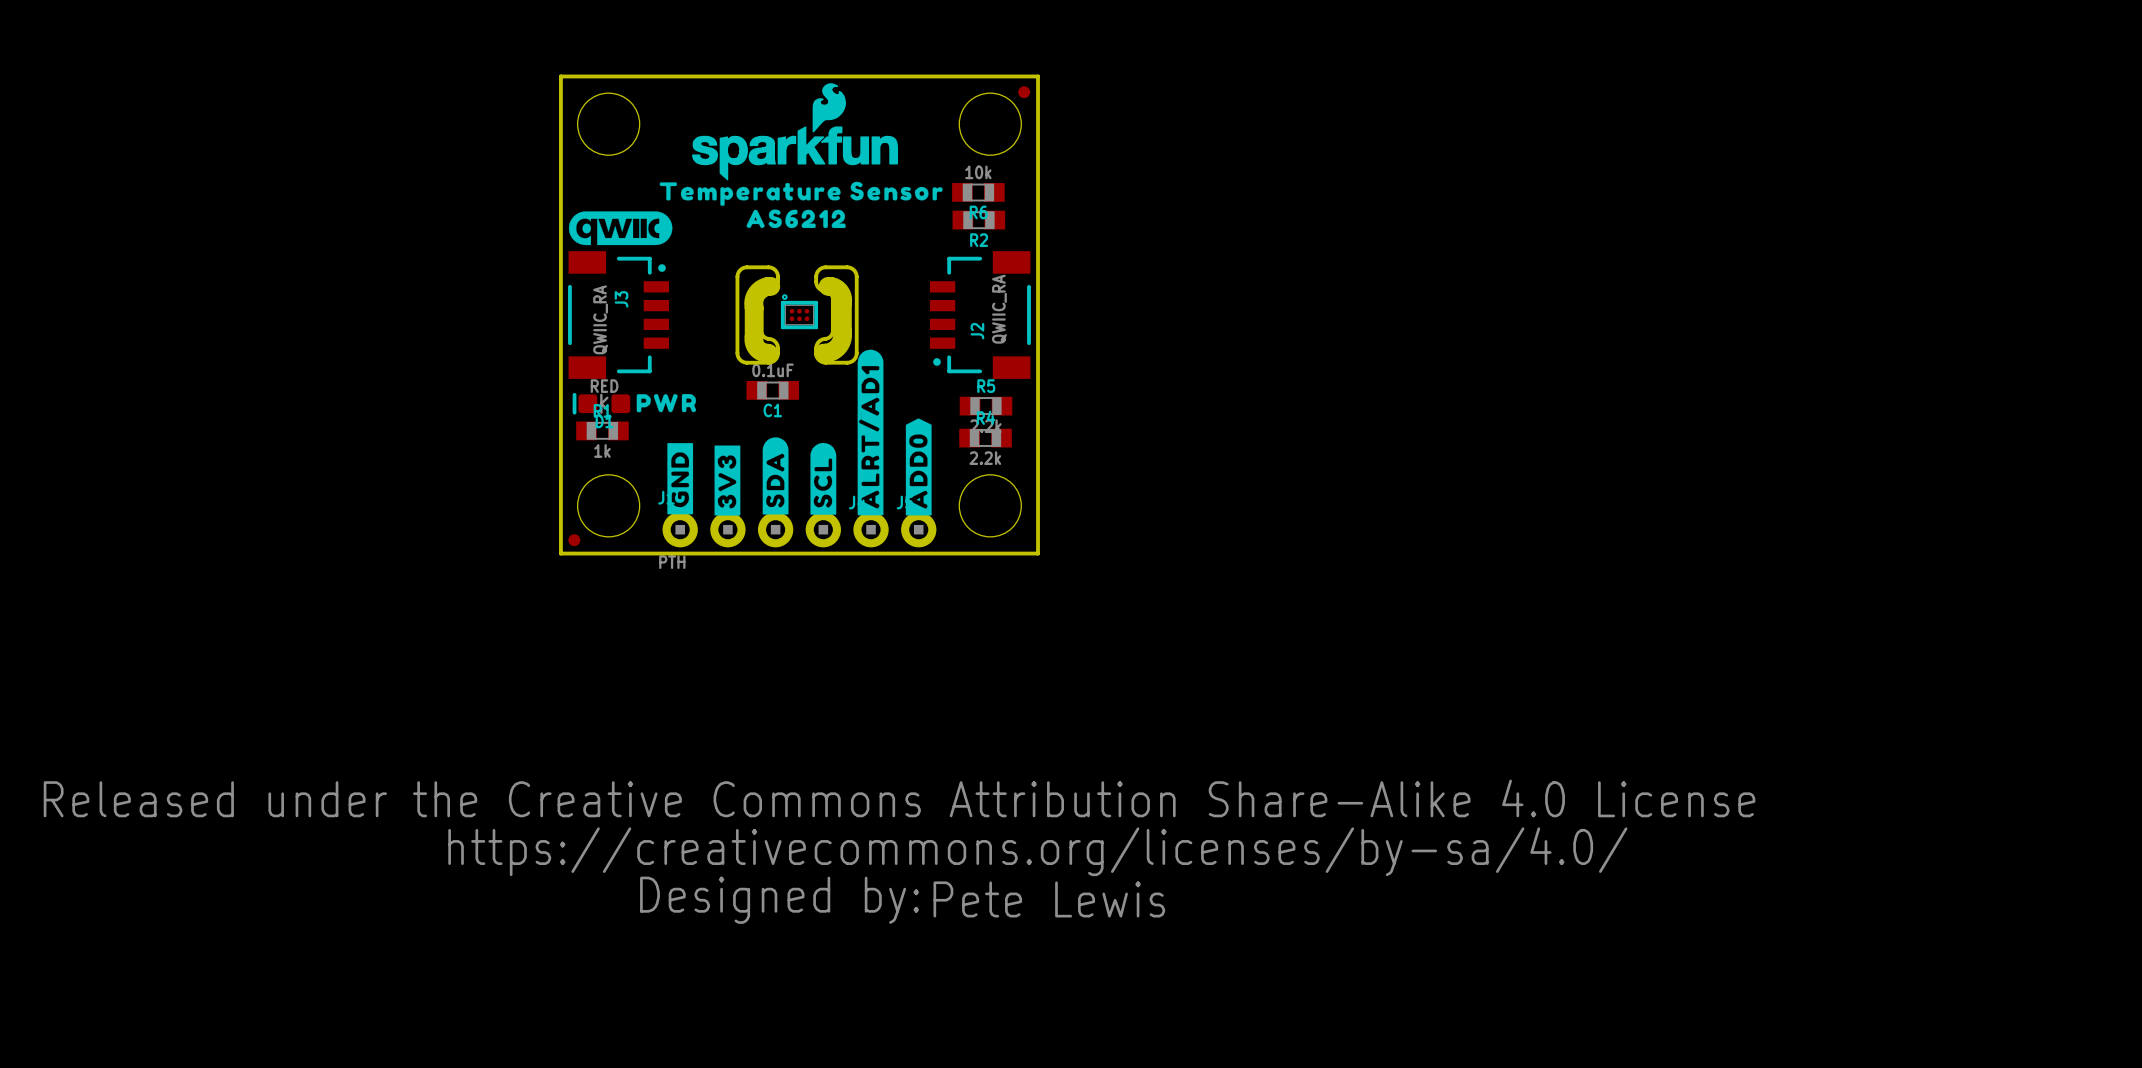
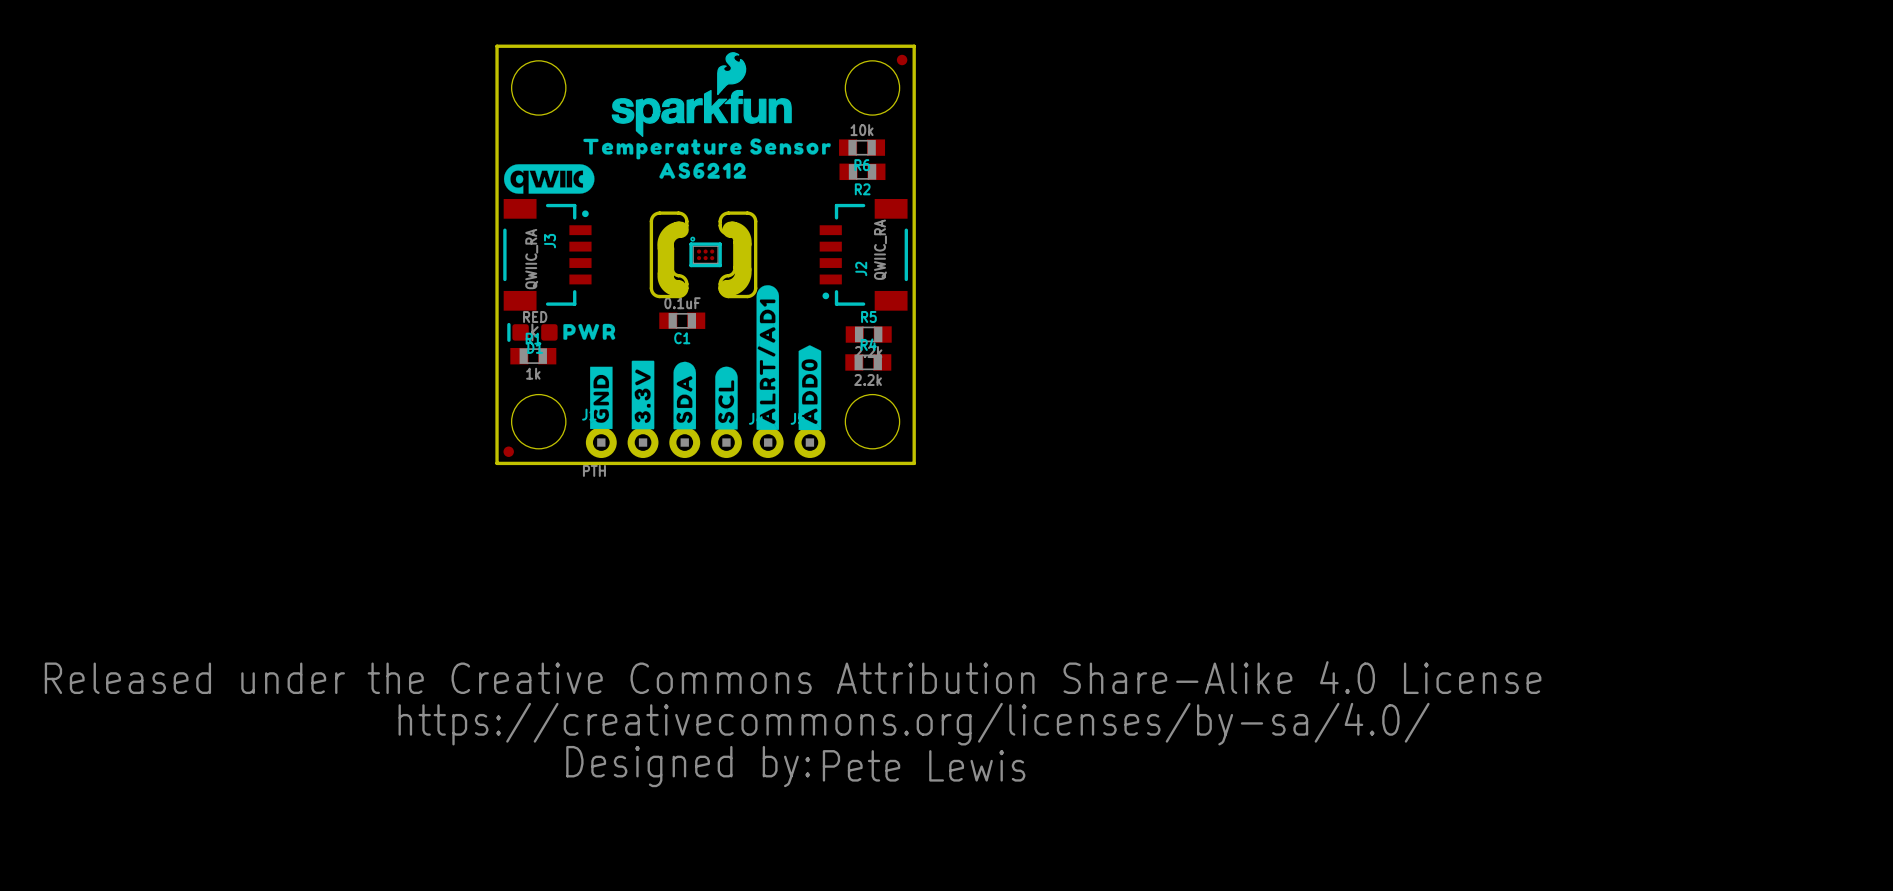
drawing shape: [714, 445, 741, 516] -> [631, 360, 655, 430]

